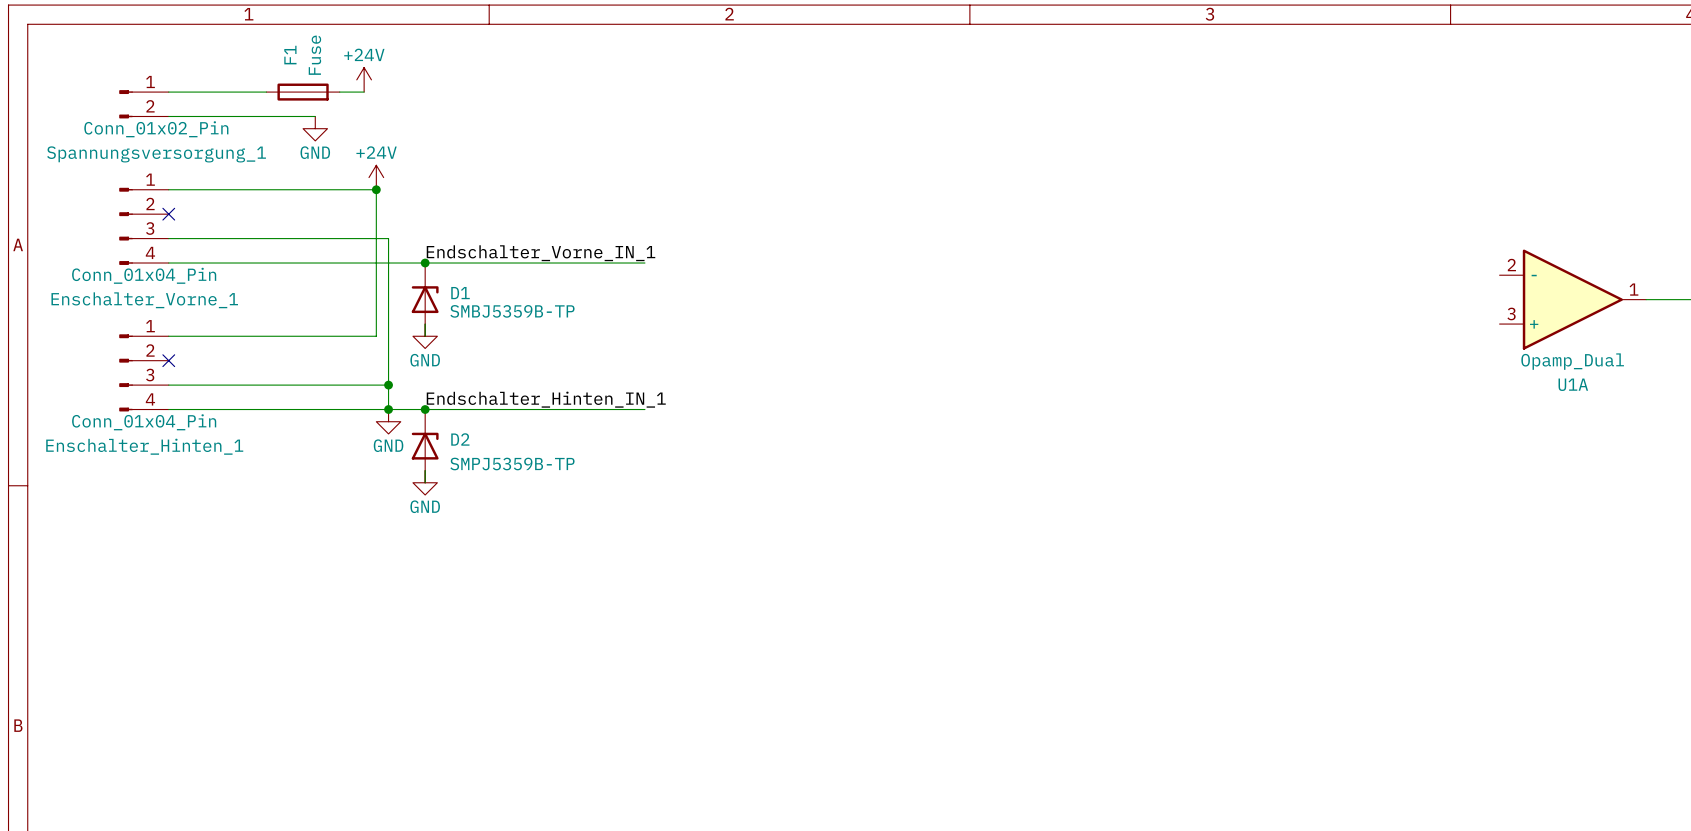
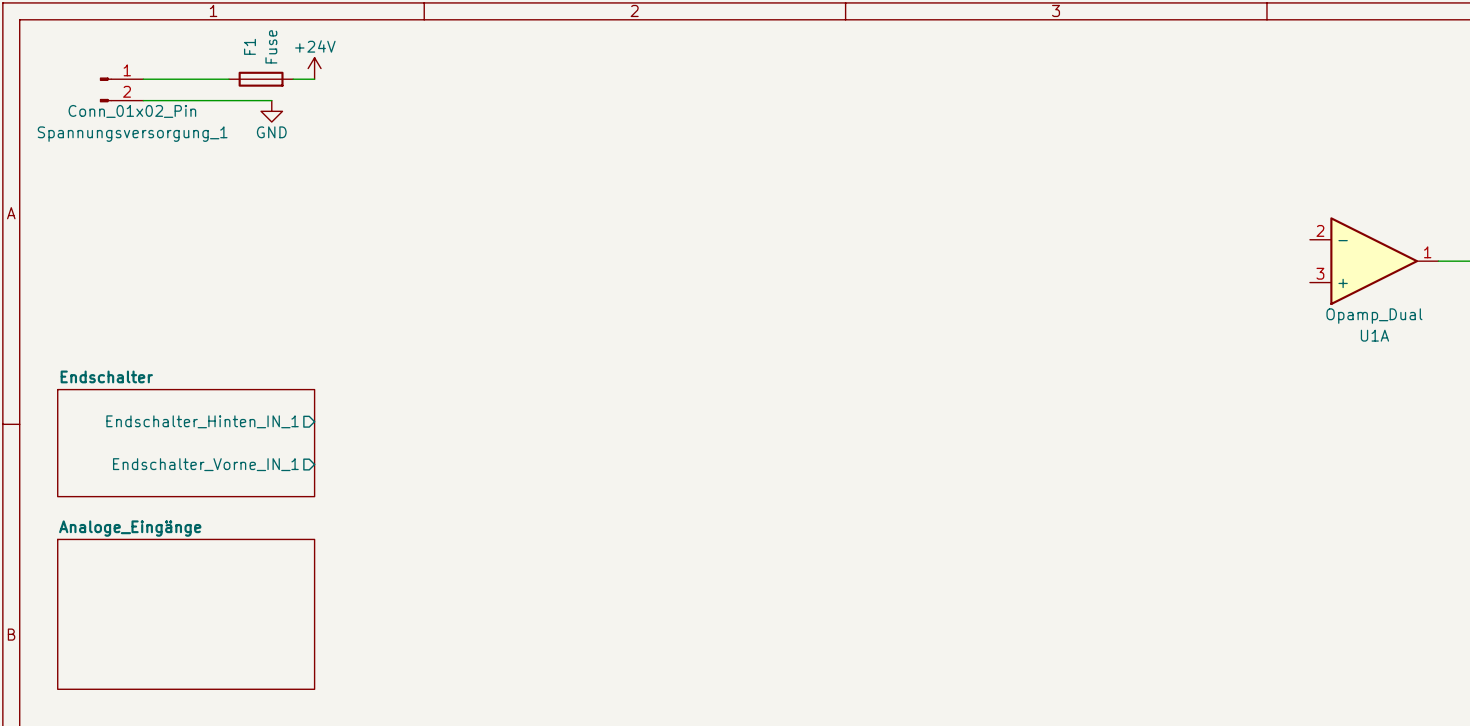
power symbol: +24V (376, 177) -> none
wire: (168, 189) (376, 189) (376, 336) (168, 336) -> none
junction: (376, 189) -> none
no-connect mark: (168, 214) -> none
Enschalter_Vorne_1: Conn_01x04_Pin (143, 226) -> none
wire: (168, 238) (388, 238) (388, 409) -> none
label: Endschalter_Vorne_IN_1 (541, 253) -> none
wire: (168, 263) (644, 263) -> none
junction: (425, 263) -> none
D1: SMBJ5359B-TP (425, 299) -> none
wire: (425, 324) (425, 336) -> none
power symbol: GND (425, 336) -> none
no-connect mark: (168, 360) -> none
Enschalter_Hinten_1: Conn_01x04_Pin (143, 372) -> none
wire: (168, 385) (388, 385) -> none
junction: (388, 385) -> none
label: Endschalter_Hinten_IN_1 (546, 399) -> none
wire: (168, 409) (644, 409) -> none
junction: (388, 409) -> none
junction: (425, 409) -> none
power symbol: GND (388, 421) -> none
D2: SMPJ5359B-TP (425, 446) -> none
wire: (425, 470) (425, 482) -> none
power symbol: GND (425, 482) -> none
sheet pin: none -> Endschalter_Hinten_IN_1 (202, 421)
sheet Endschalter: none -> (186, 443)
sheet pin: none -> Endschalter_Vorne_IN_1 (205, 464)
sheet Analoge_Eingänge: none -> (186, 614)

